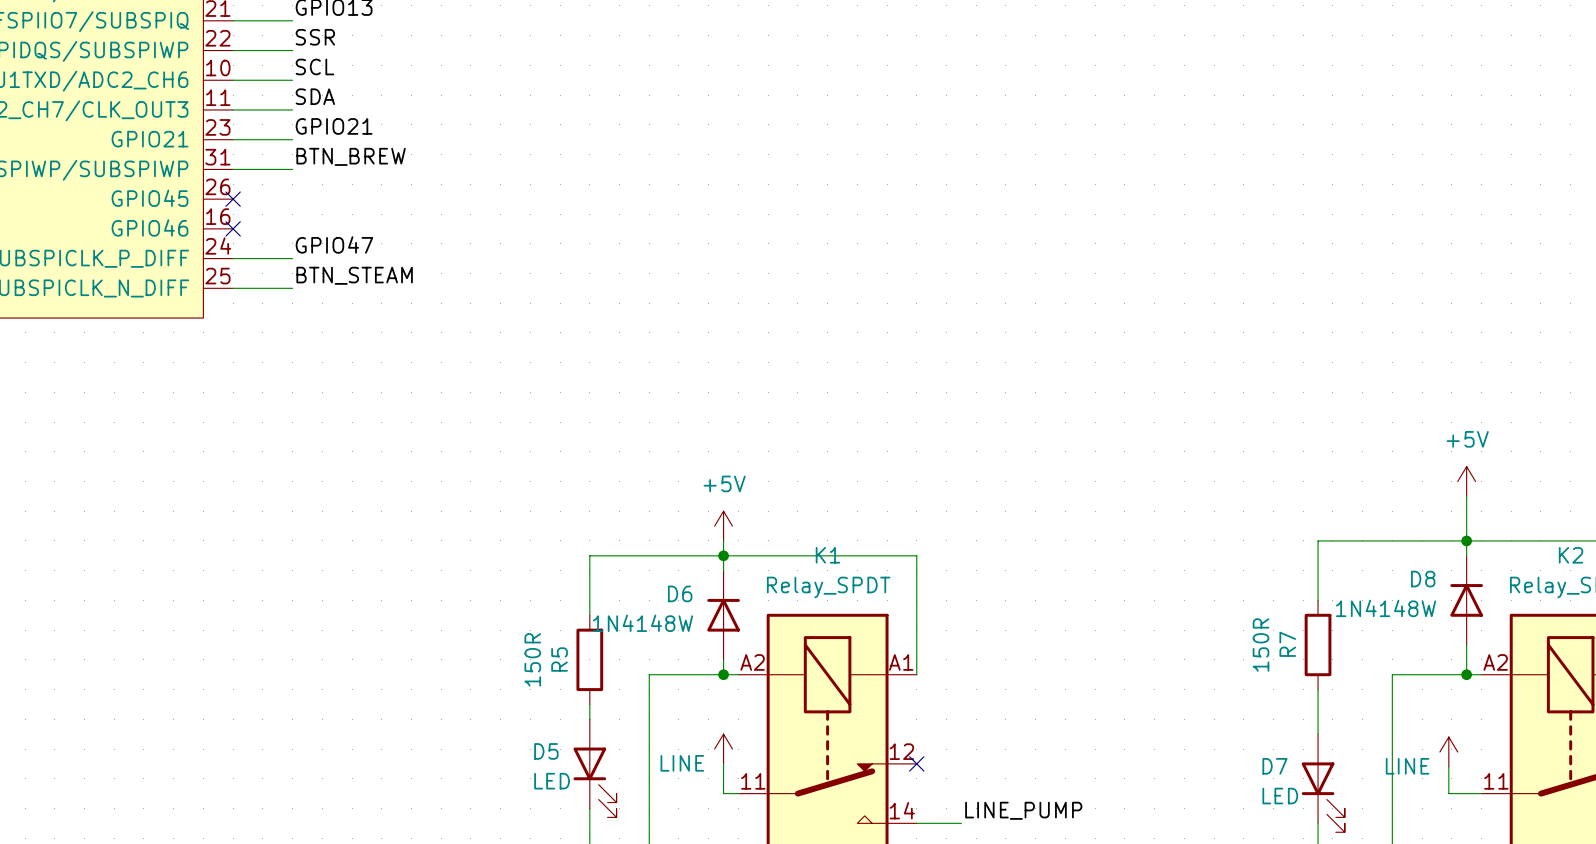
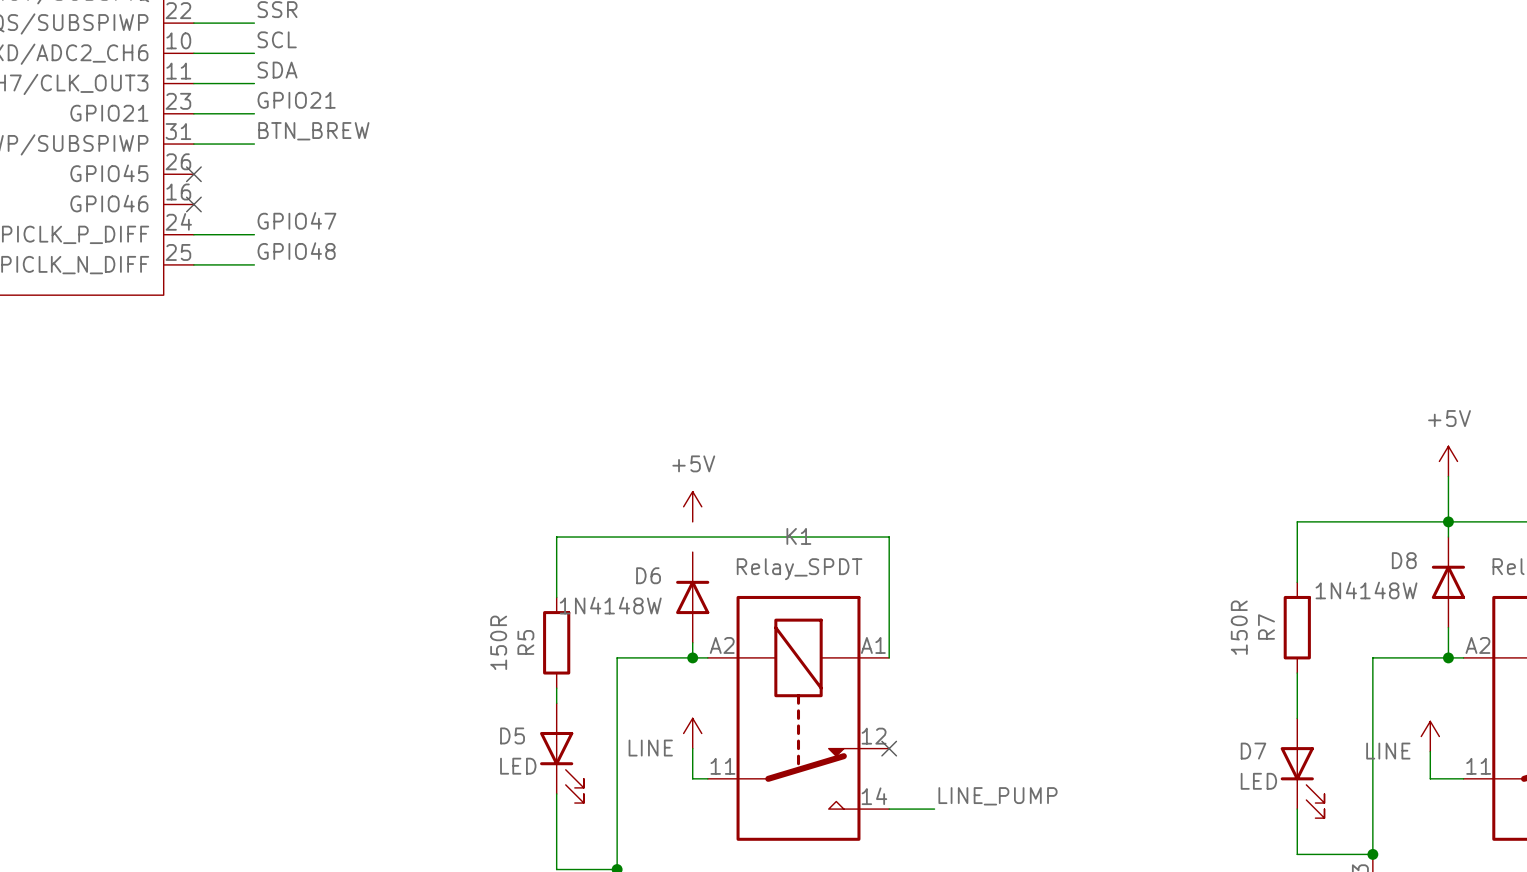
label: BTN_STEAM (354, 275) -> GPIO48 (296, 251)
wire: (723, 540) (723, 570) -> none
junction: (723, 555) -> none

